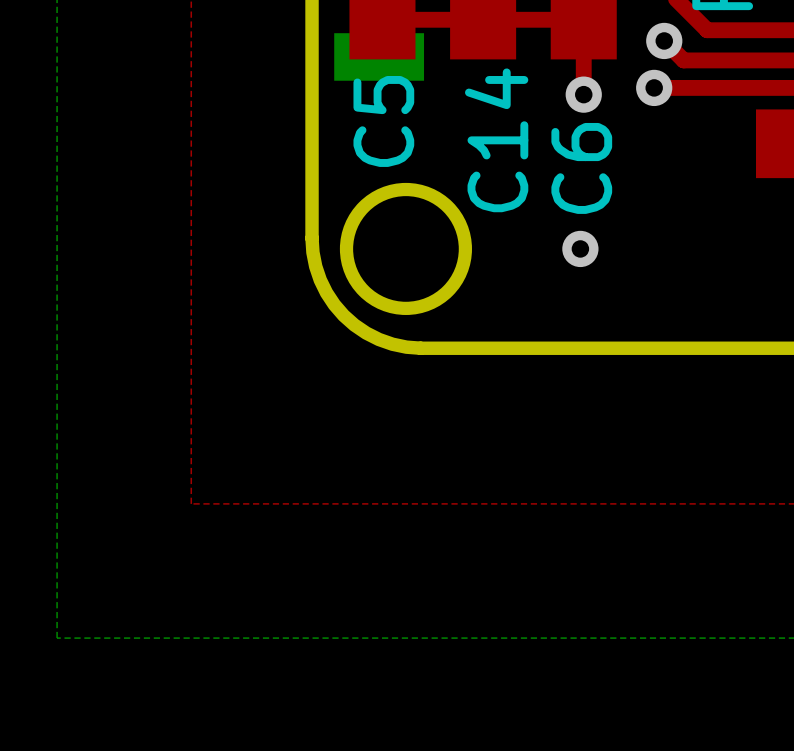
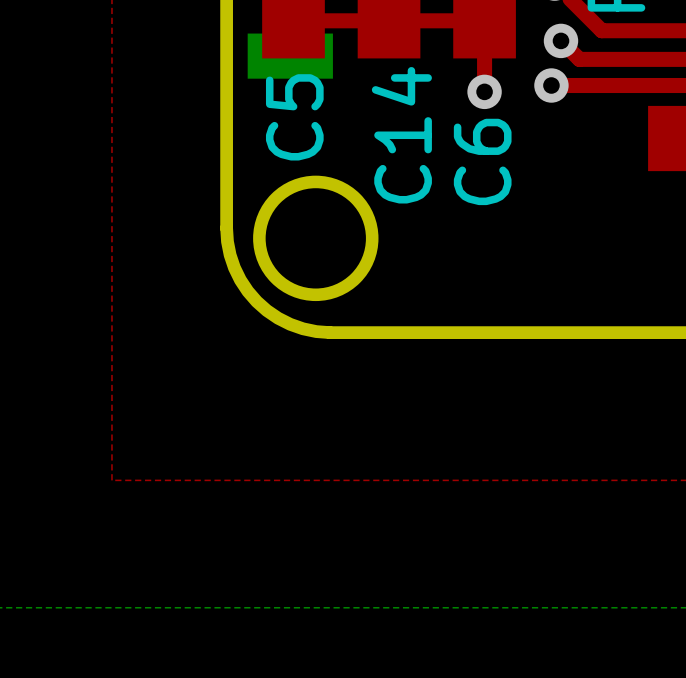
via: (580, 248) -> none

